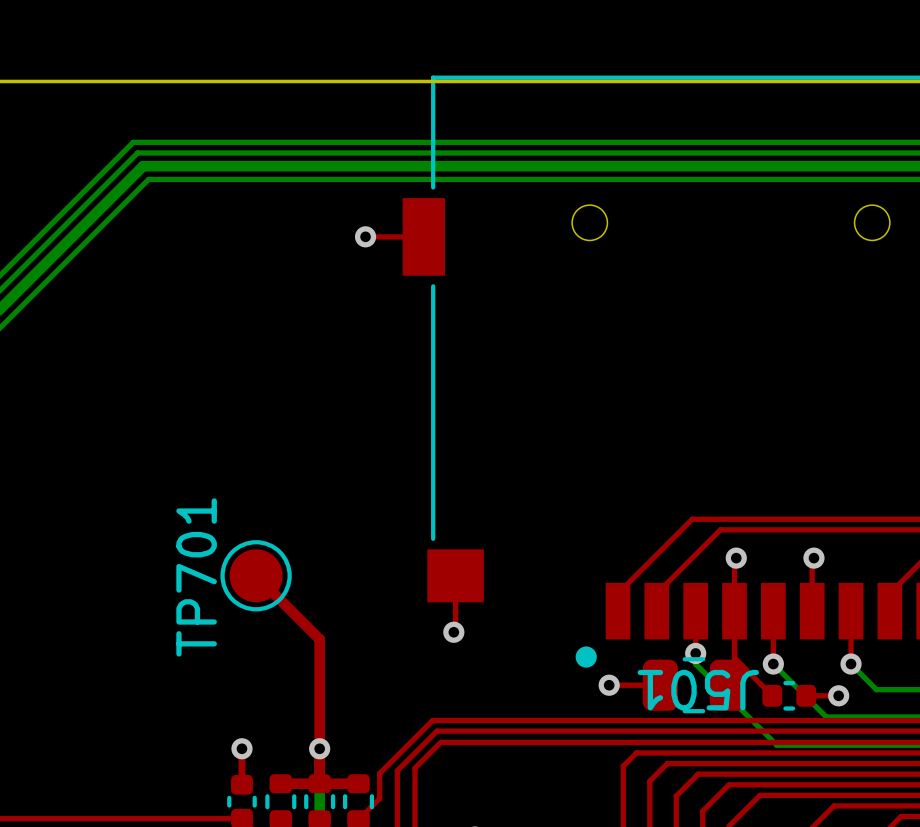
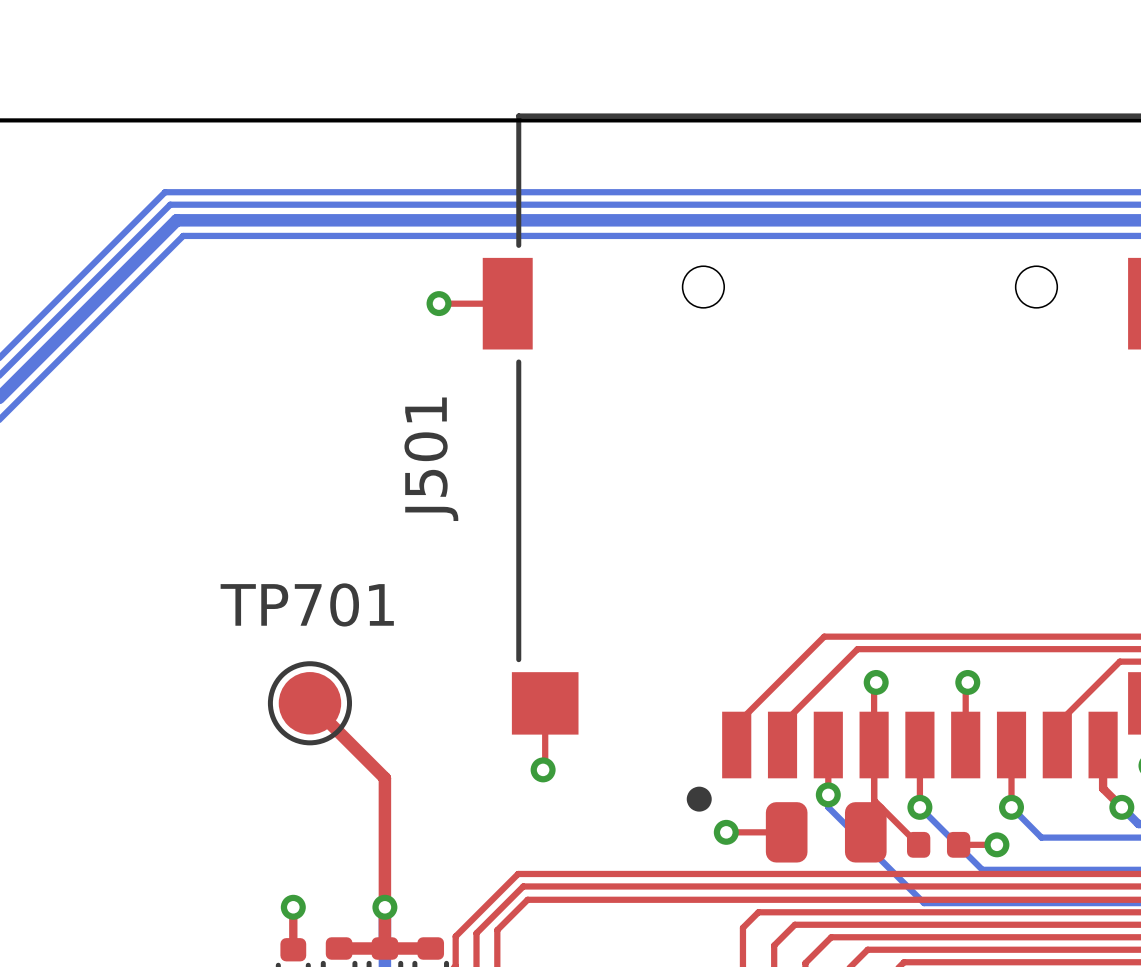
TP701 name rotation: 0° (196, 577) -> 90° clockwise (307, 604)
part footprint: [642, 657, 746, 714] -> [765, 802, 887, 863]
part footprint: [762, 680, 817, 711] -> [907, 831, 971, 858]
J501 name rotation: 0° (698, 690) -> 90° clockwise (431, 459)
J501 name position: J501 (698, 690) -> J501 (431, 459)

